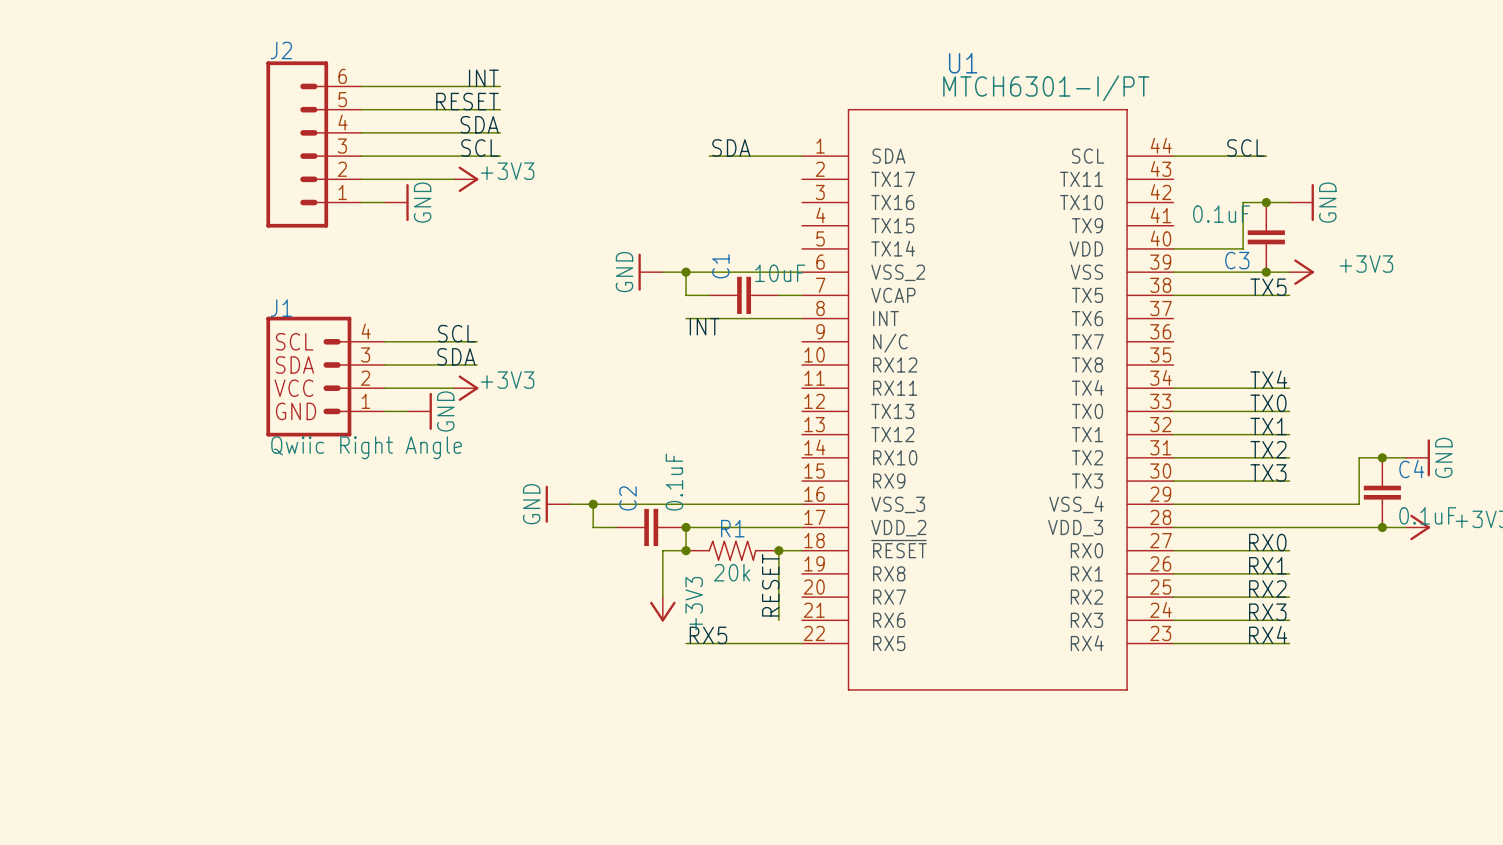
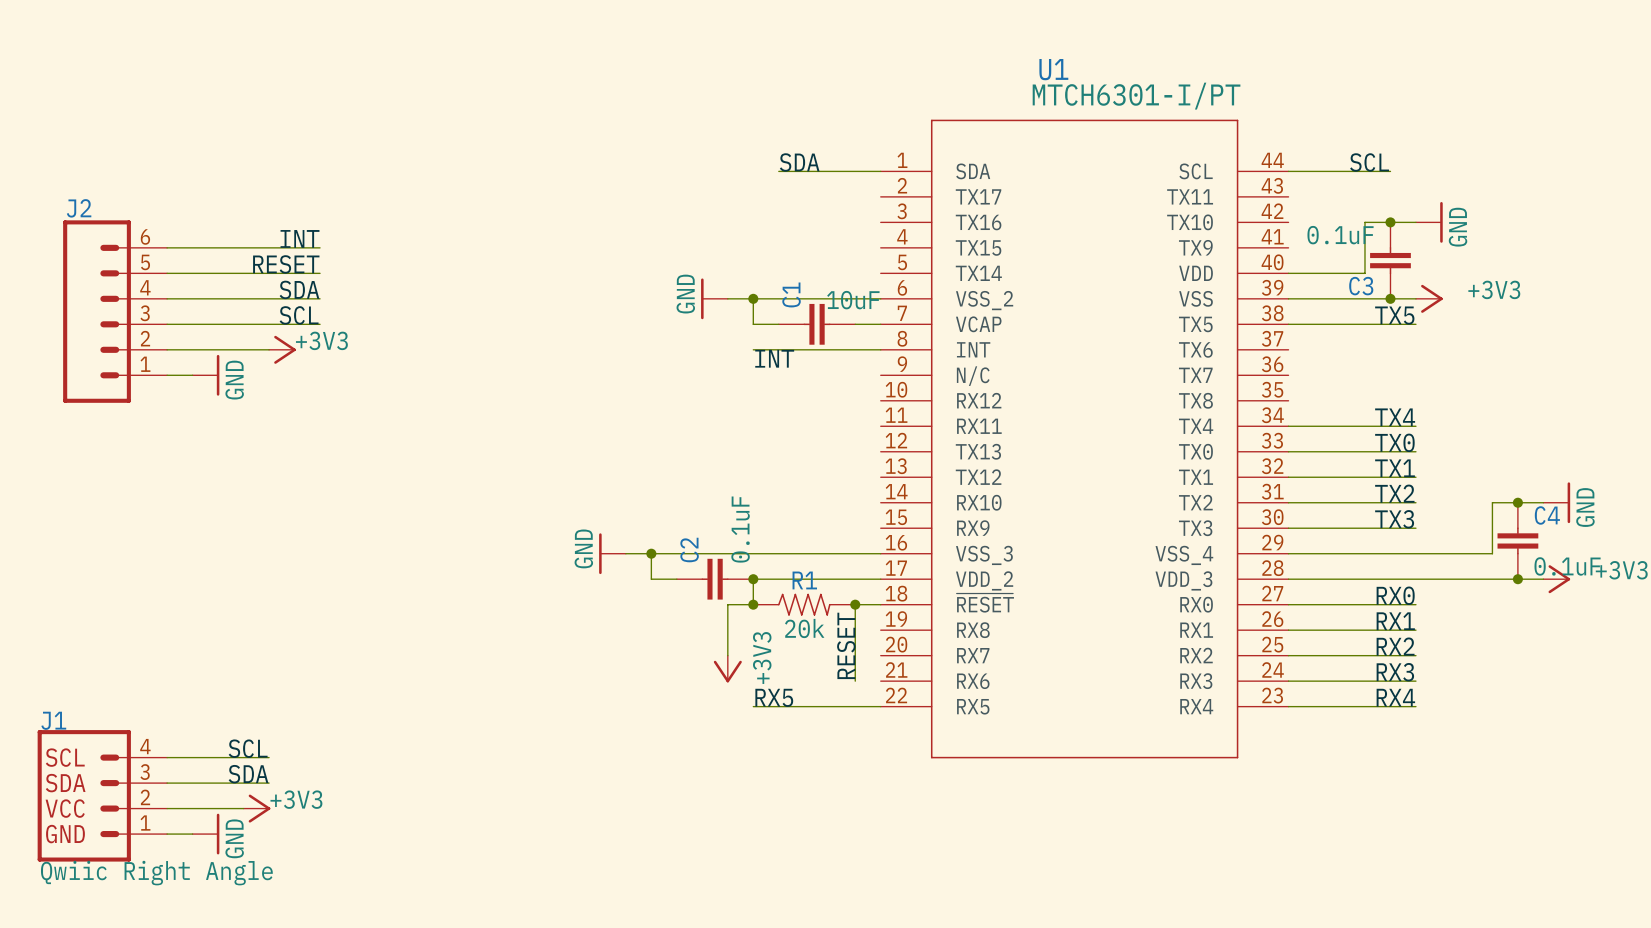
label: INT (483, 78) -> none
wire: (361, 86) (500, 86) -> none
label: RESET (467, 101) -> none
wire: (361, 109) (500, 109) -> none
label: SDA (479, 124) -> none
wire: (361, 132) (500, 132) -> none
J2 position: (313, 144) -> (115, 311)
label: SCL (480, 147) -> none
wire: (361, 156) (500, 156) -> (167, 247) (320, 247)
wire: (361, 179) (453, 179) -> none
power symbol: +3V3 (466, 179) -> none
wire: (361, 202) (384, 202) -> none
power symbol: GND (396, 202) -> none
label: none -> INT (300, 238)
label: none -> RESET (286, 264)
wire: none -> (167, 273) (320, 273)
label: none -> SDA (299, 289)
wire: none -> (167, 298) (320, 298)
label: none -> SCL (299, 315)
wire: none -> (167, 324) (320, 324)
wire: none -> (167, 349) (269, 349)
power symbol: none -> +3V3 (282, 349)
label: SCL (456, 333) -> none
wire: none -> (167, 375) (192, 375)
power symbol: none -> GND (205, 375)
wire: (384, 341) (477, 341) -> none
label: SDA (456, 356) -> none
wire: (384, 365) (477, 365) -> none
J1 position: (325, 376) -> (102, 795)
wire: (384, 388) (453, 388) -> none
power symbol: +3V3 (466, 388) -> none
wire: (384, 411) (407, 411) -> none
power symbol: GND (419, 411) -> none
label: none -> SCL (248, 748)
wire: none -> (167, 757) (269, 757)
label: none -> SDA (248, 774)
wire: none -> (167, 783) (269, 783)
wire: none -> (167, 808) (243, 808)
power symbol: none -> +3V3 (256, 808)
wire: none -> (167, 834) (192, 834)
power symbol: none -> GND (205, 834)

